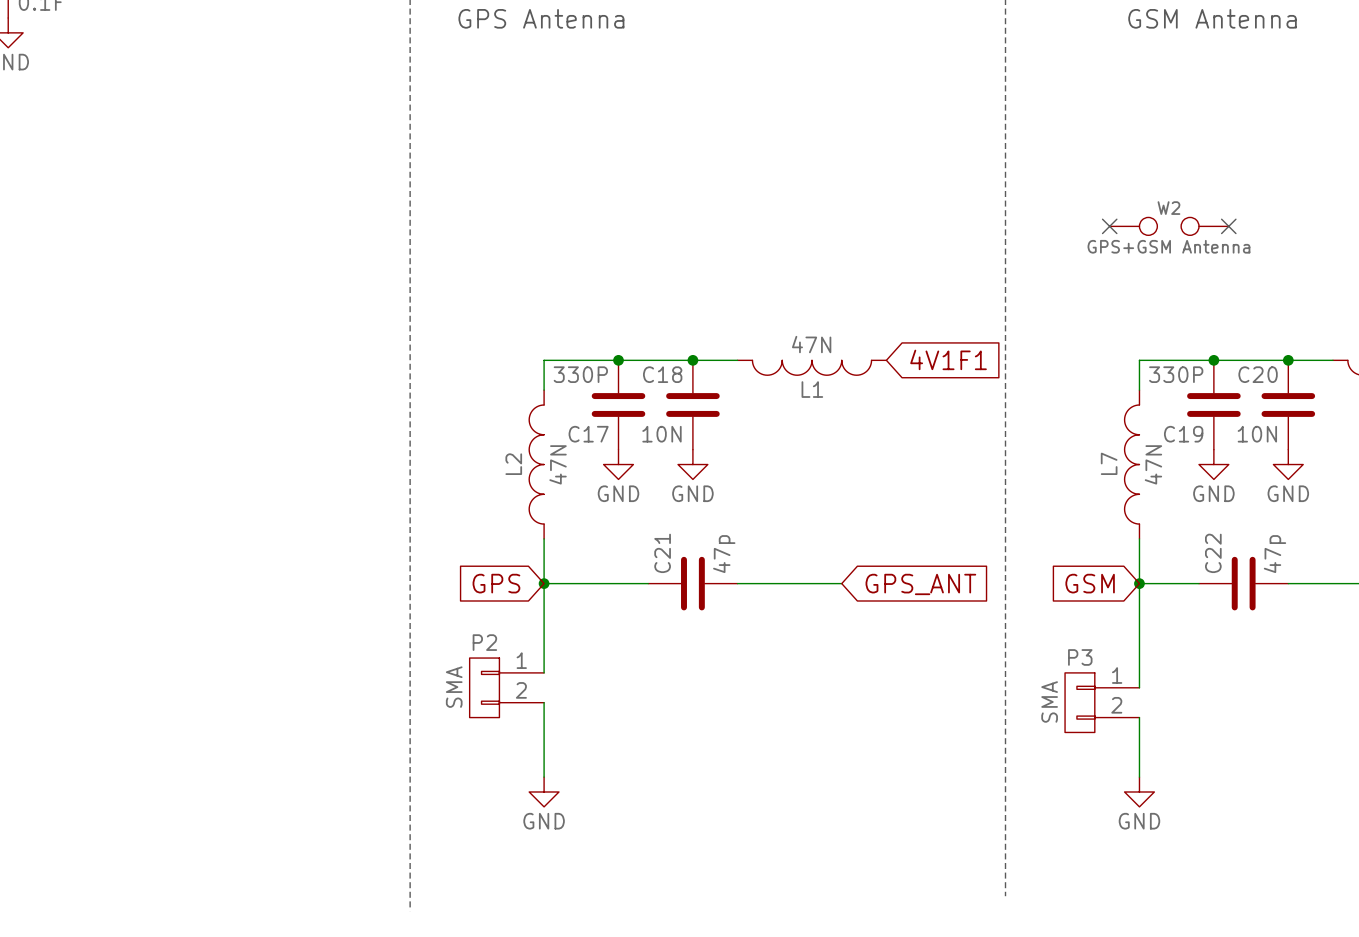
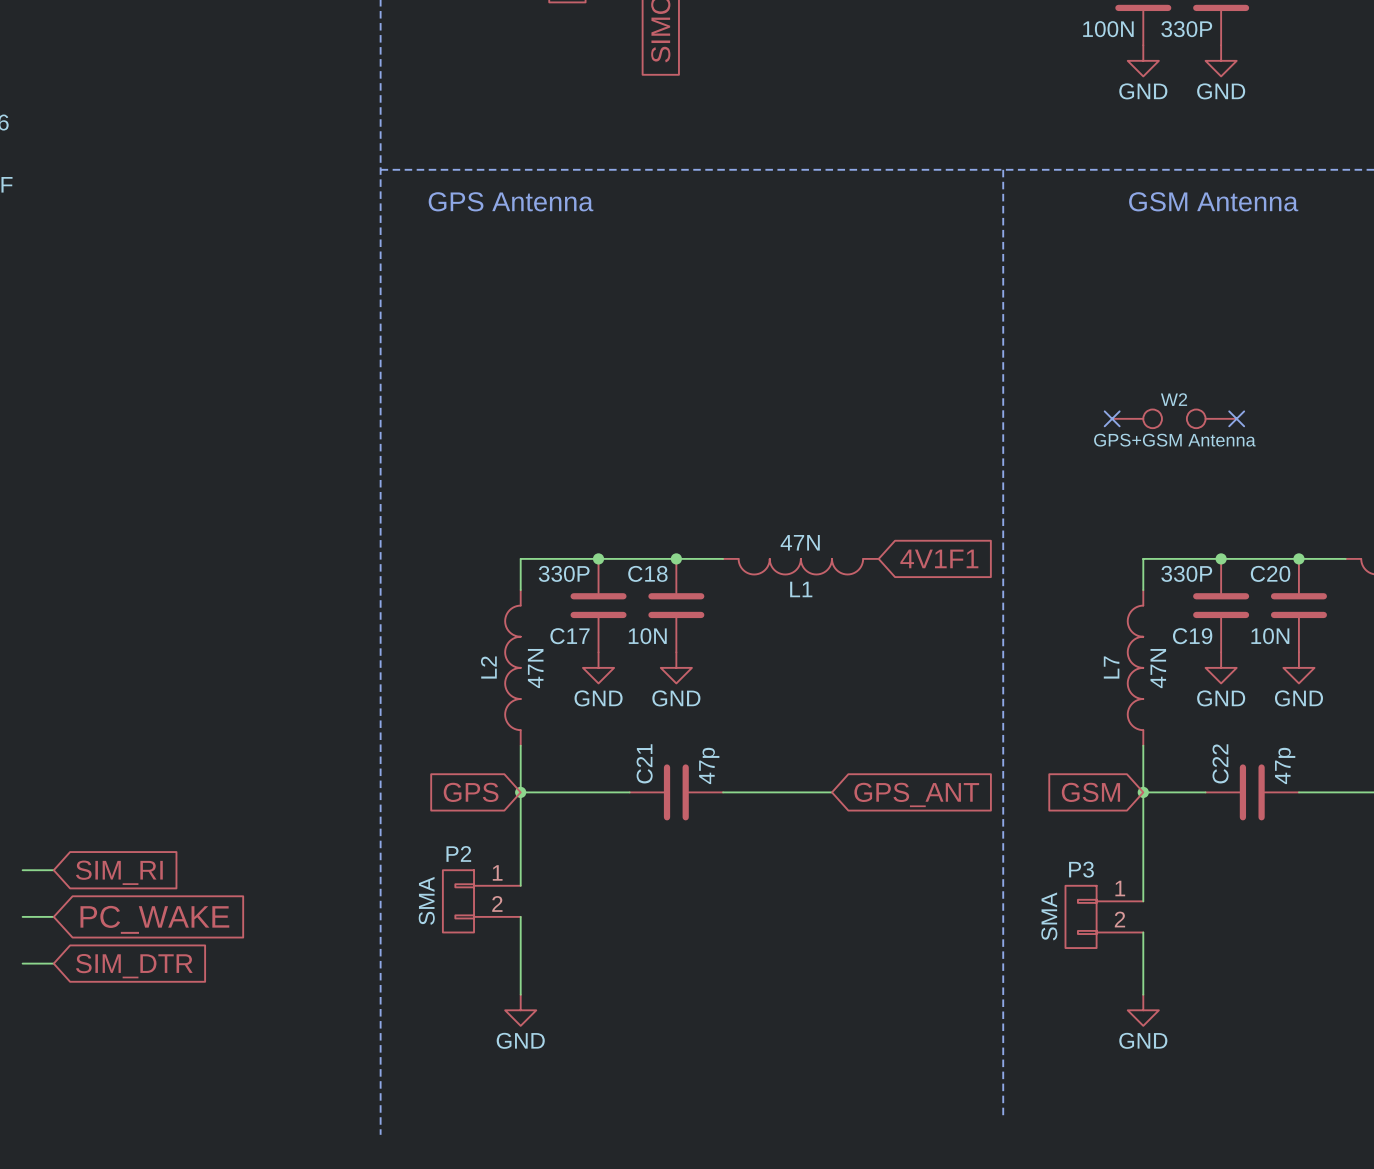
wire: none -> (22, 870) (53, 870)
global label: none -> SIM_RI (119, 872)
wire: none -> (22, 916) (53, 916)
global label: none -> PC_WAKE (154, 919)
wire: none -> (22, 963) (53, 963)
global label: none -> SIM_DTR (134, 966)

